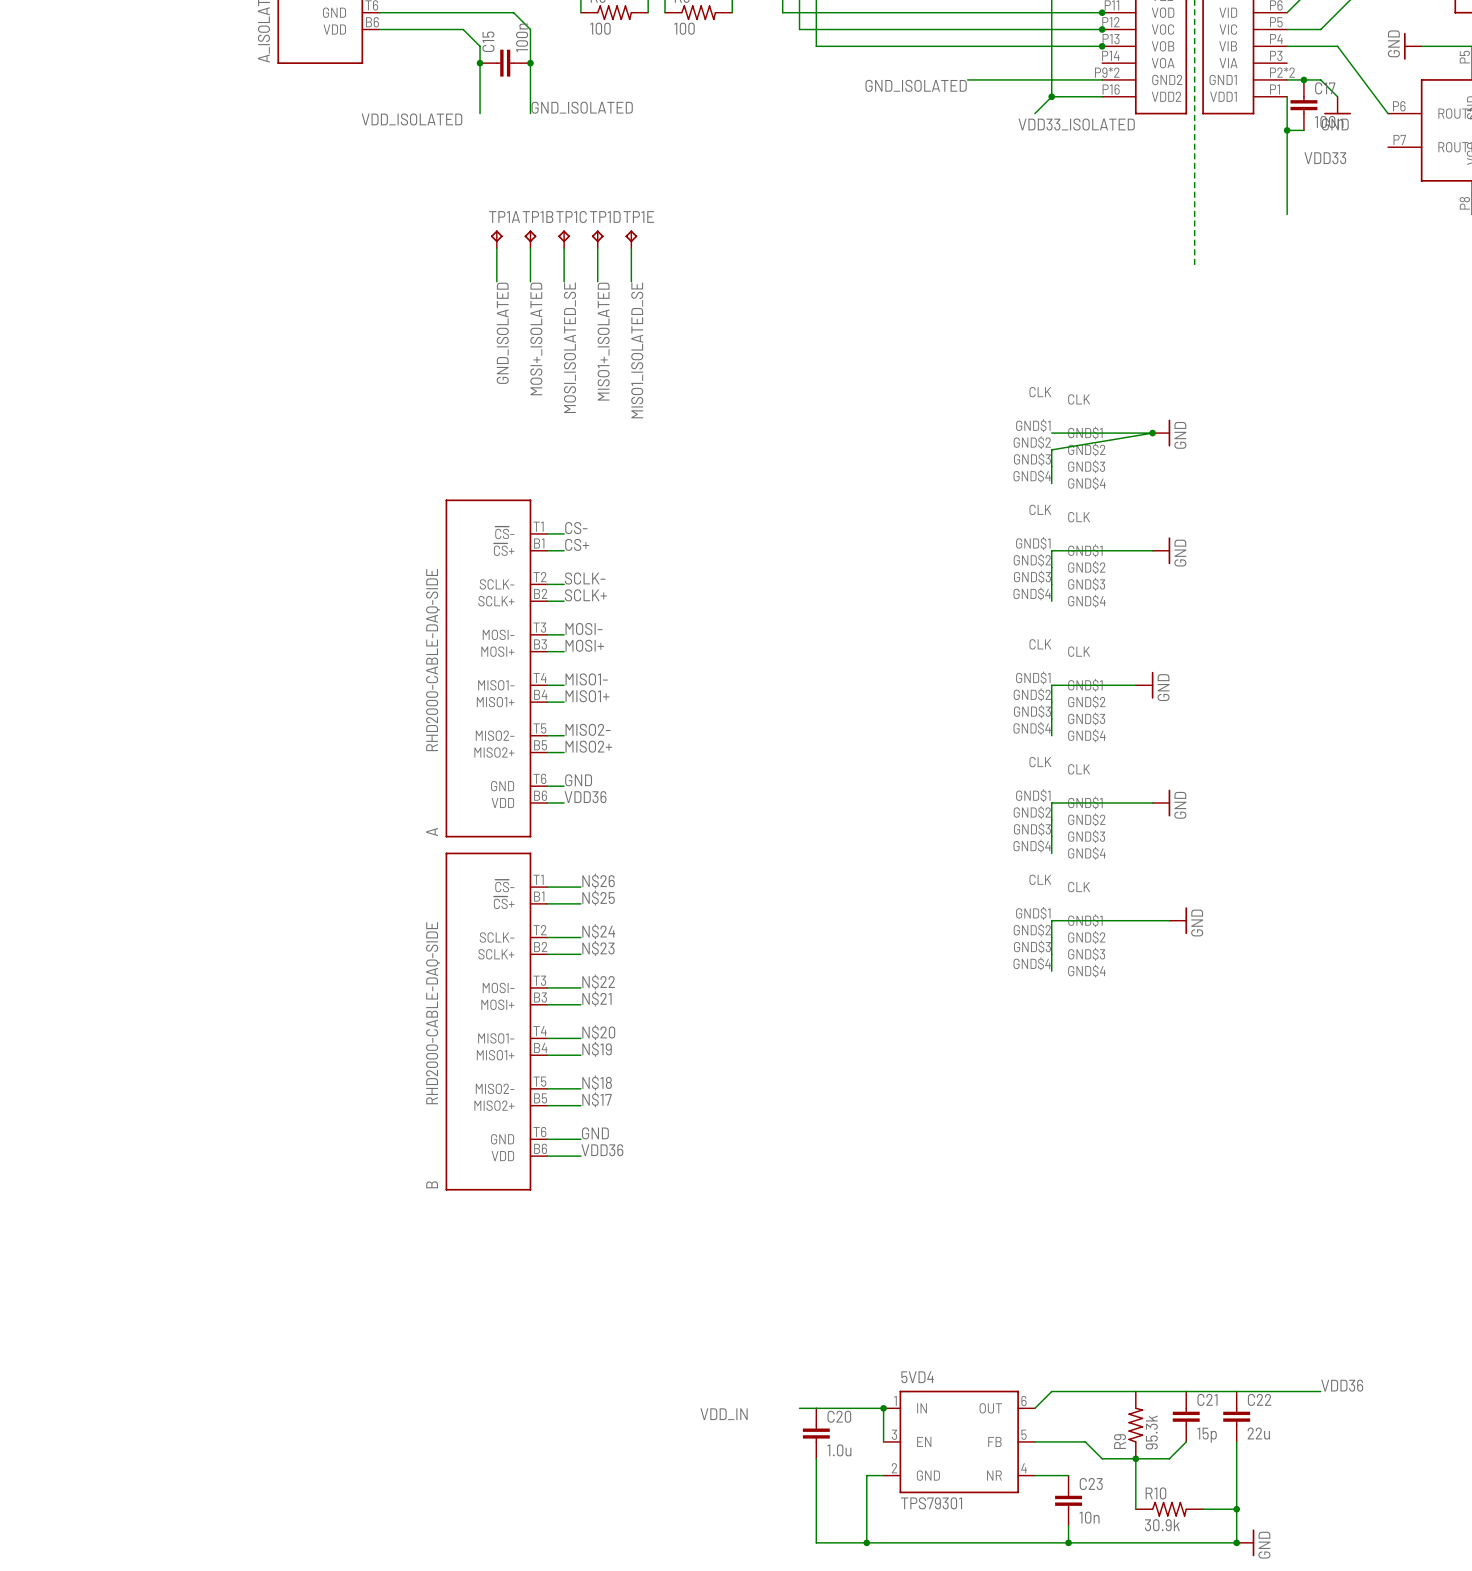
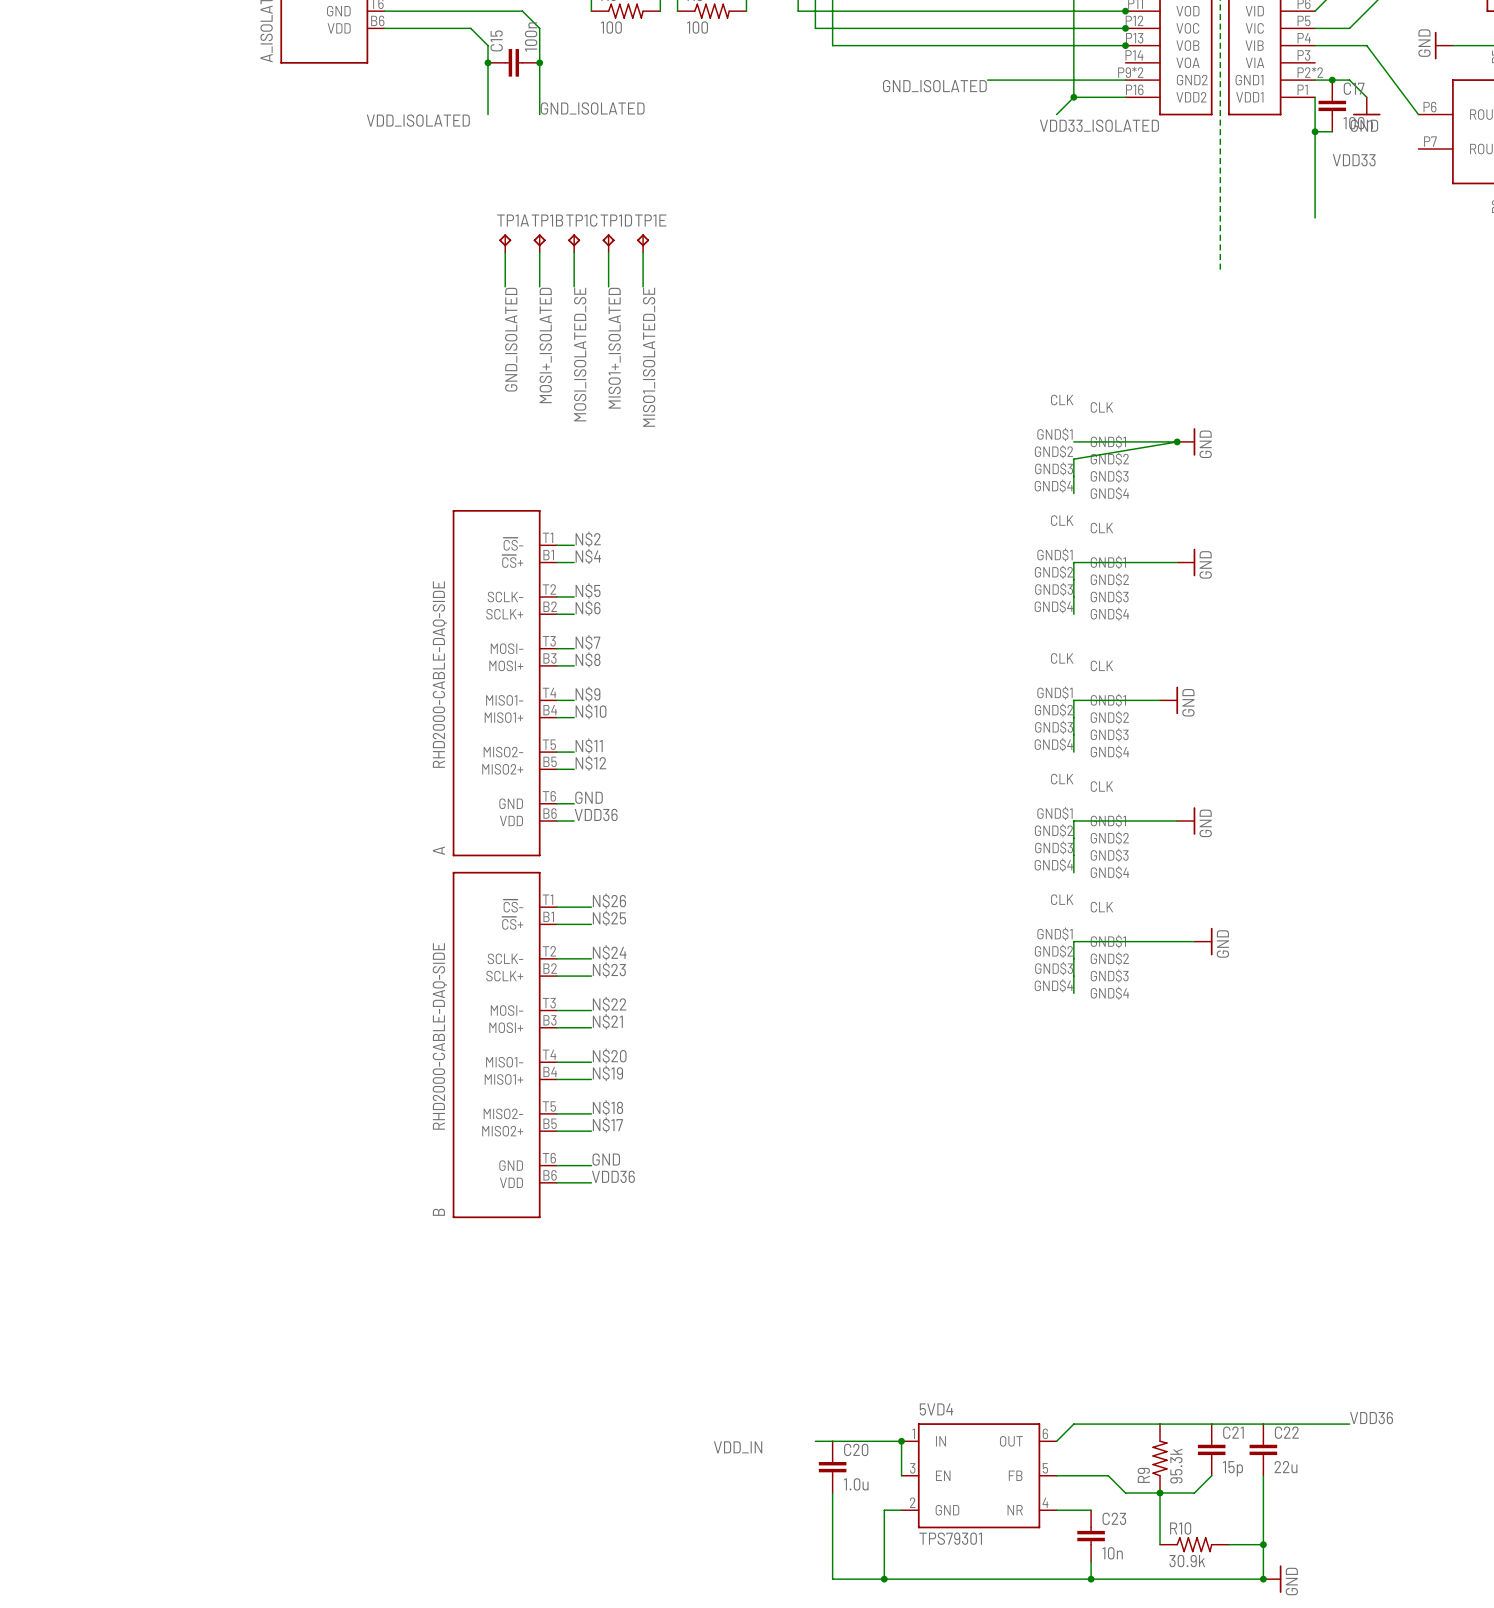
label: CS- (576, 528) -> N$2 (588, 539)
label: CS+ (577, 544) -> N$4 (588, 556)
label: SCLK- (585, 578) -> N$5 (588, 590)
label: SCLK+ (585, 595) -> N$6 (588, 608)
label: MOSI- (583, 628) -> N$7 (587, 642)
label: MOSI+ (584, 645) -> N$8 (588, 659)
label: MISO1- (586, 679) -> N$9 (588, 694)
label: MISO1+ (587, 696) -> N$10 (591, 711)
label: MISO2- (588, 729) -> N$11 (589, 745)
label: MISO2+ (588, 746) -> N$12 (590, 763)

